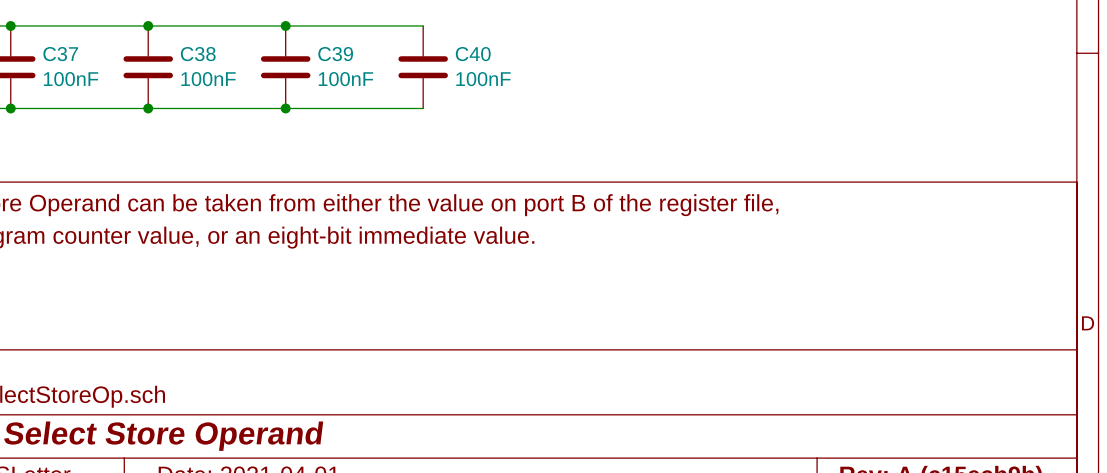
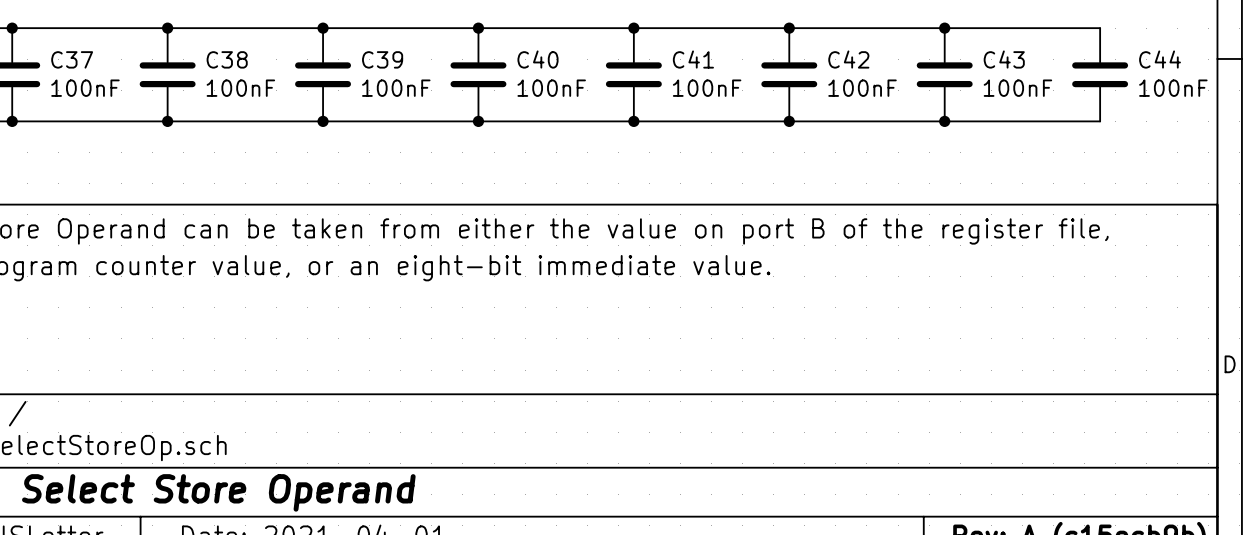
wire: none -> (478, 28) (1100, 28)
junction: none -> (478, 28)
junction: none -> (633, 28)
junction: none -> (789, 28)
junction: none -> (944, 28)
C41: none -> 100nF (633, 74)
C42: none -> 100nF (789, 74)
C43: none -> 100nF (944, 74)
C44: none -> 100nF (1100, 74)
wire: none -> (478, 121) (1100, 121)
junction: none -> (478, 121)
junction: none -> (633, 121)
junction: none -> (789, 121)
junction: none -> (944, 121)

